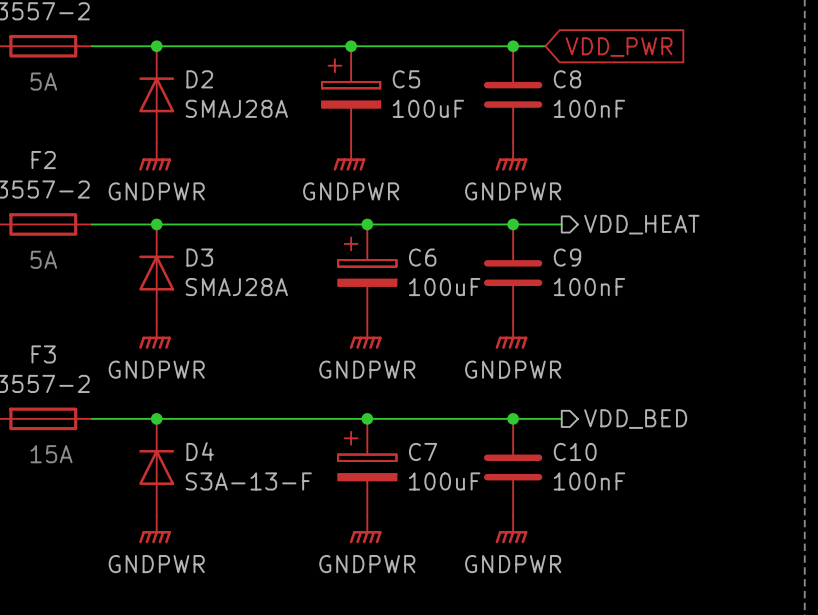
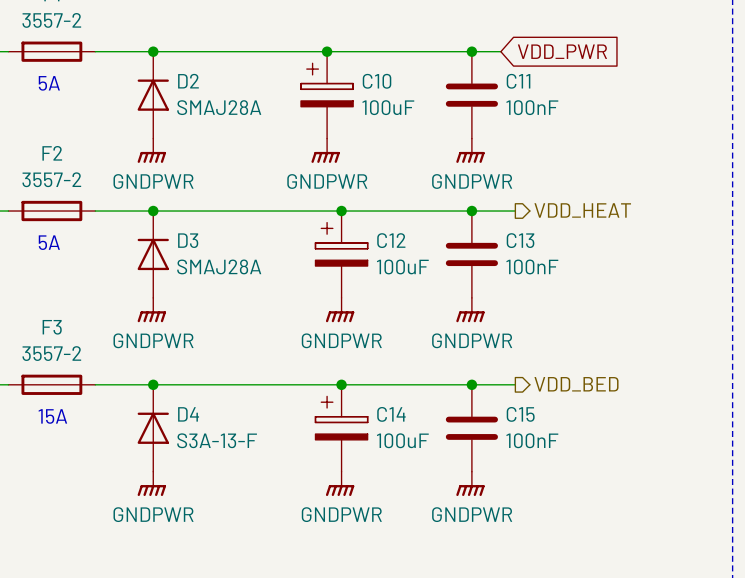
C5 name: C5 (406, 79) -> C10 (377, 81)
C8 name: C8 (567, 79) -> C11 (518, 81)
C6 name: C6 (422, 257) -> C12 (391, 240)
C9 name: C9 (567, 257) -> C13 (520, 240)
C7 name: C7 (423, 451) -> C14 (391, 414)
C10 name: C10 (575, 451) -> C15 (520, 414)

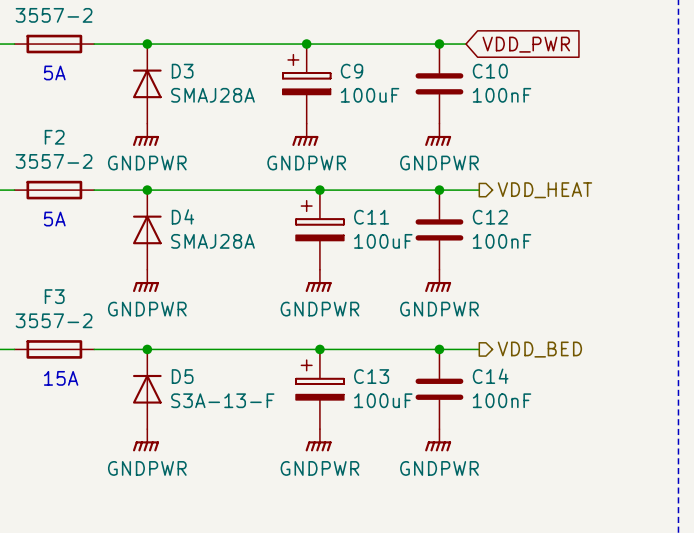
D2 name: D2 (188, 81) -> D3 (182, 71)
C10 name: C10 (377, 81) -> C9 (352, 71)
C11 name: C11 (518, 81) -> C10 (490, 71)
D3 name: D3 (188, 240) -> D4 (182, 216)
C12 name: C12 (391, 240) -> C11 (371, 217)
C13 name: C13 (520, 240) -> C12 (490, 217)
D4 name: D4 (188, 414) -> D5 (182, 376)
C14 name: C14 (391, 414) -> C13 (371, 376)
C15 name: C15 (520, 414) -> C14 (490, 376)

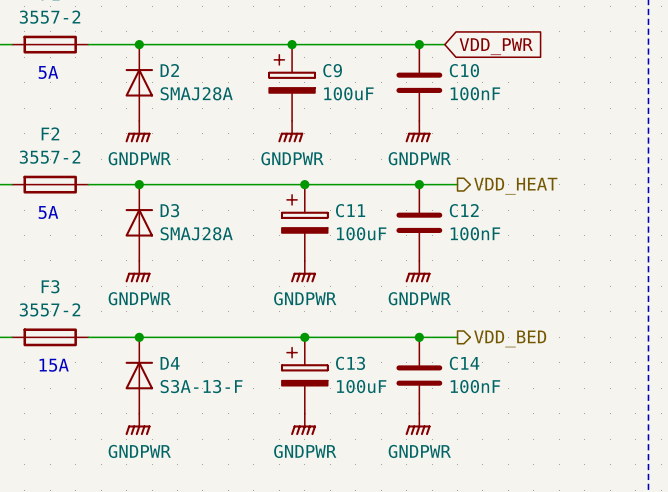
D3 name: D3 (182, 71) -> D2 (169, 70)
D4 name: D4 (182, 216) -> D3 (169, 210)
D5 name: D5 (182, 376) -> D4 (170, 363)

